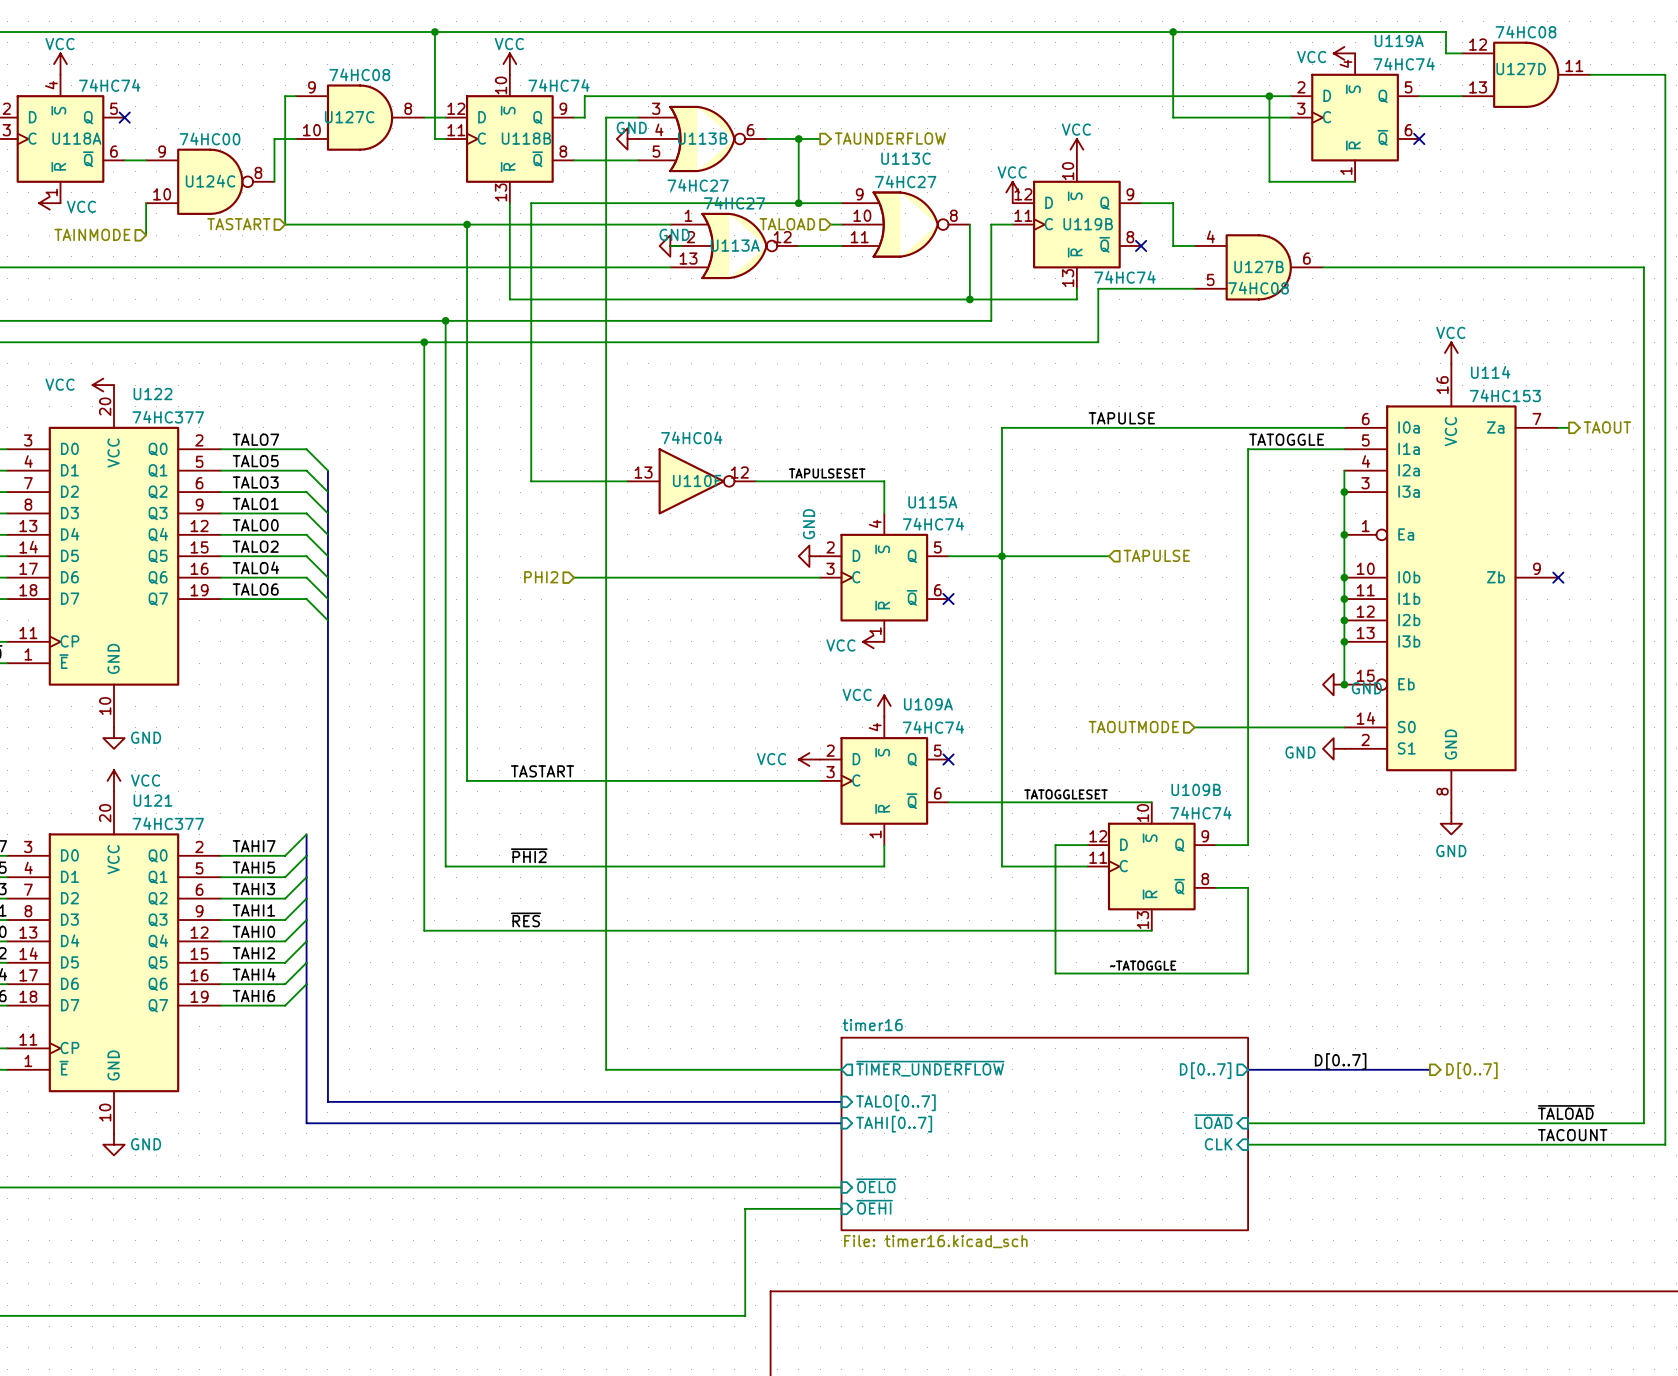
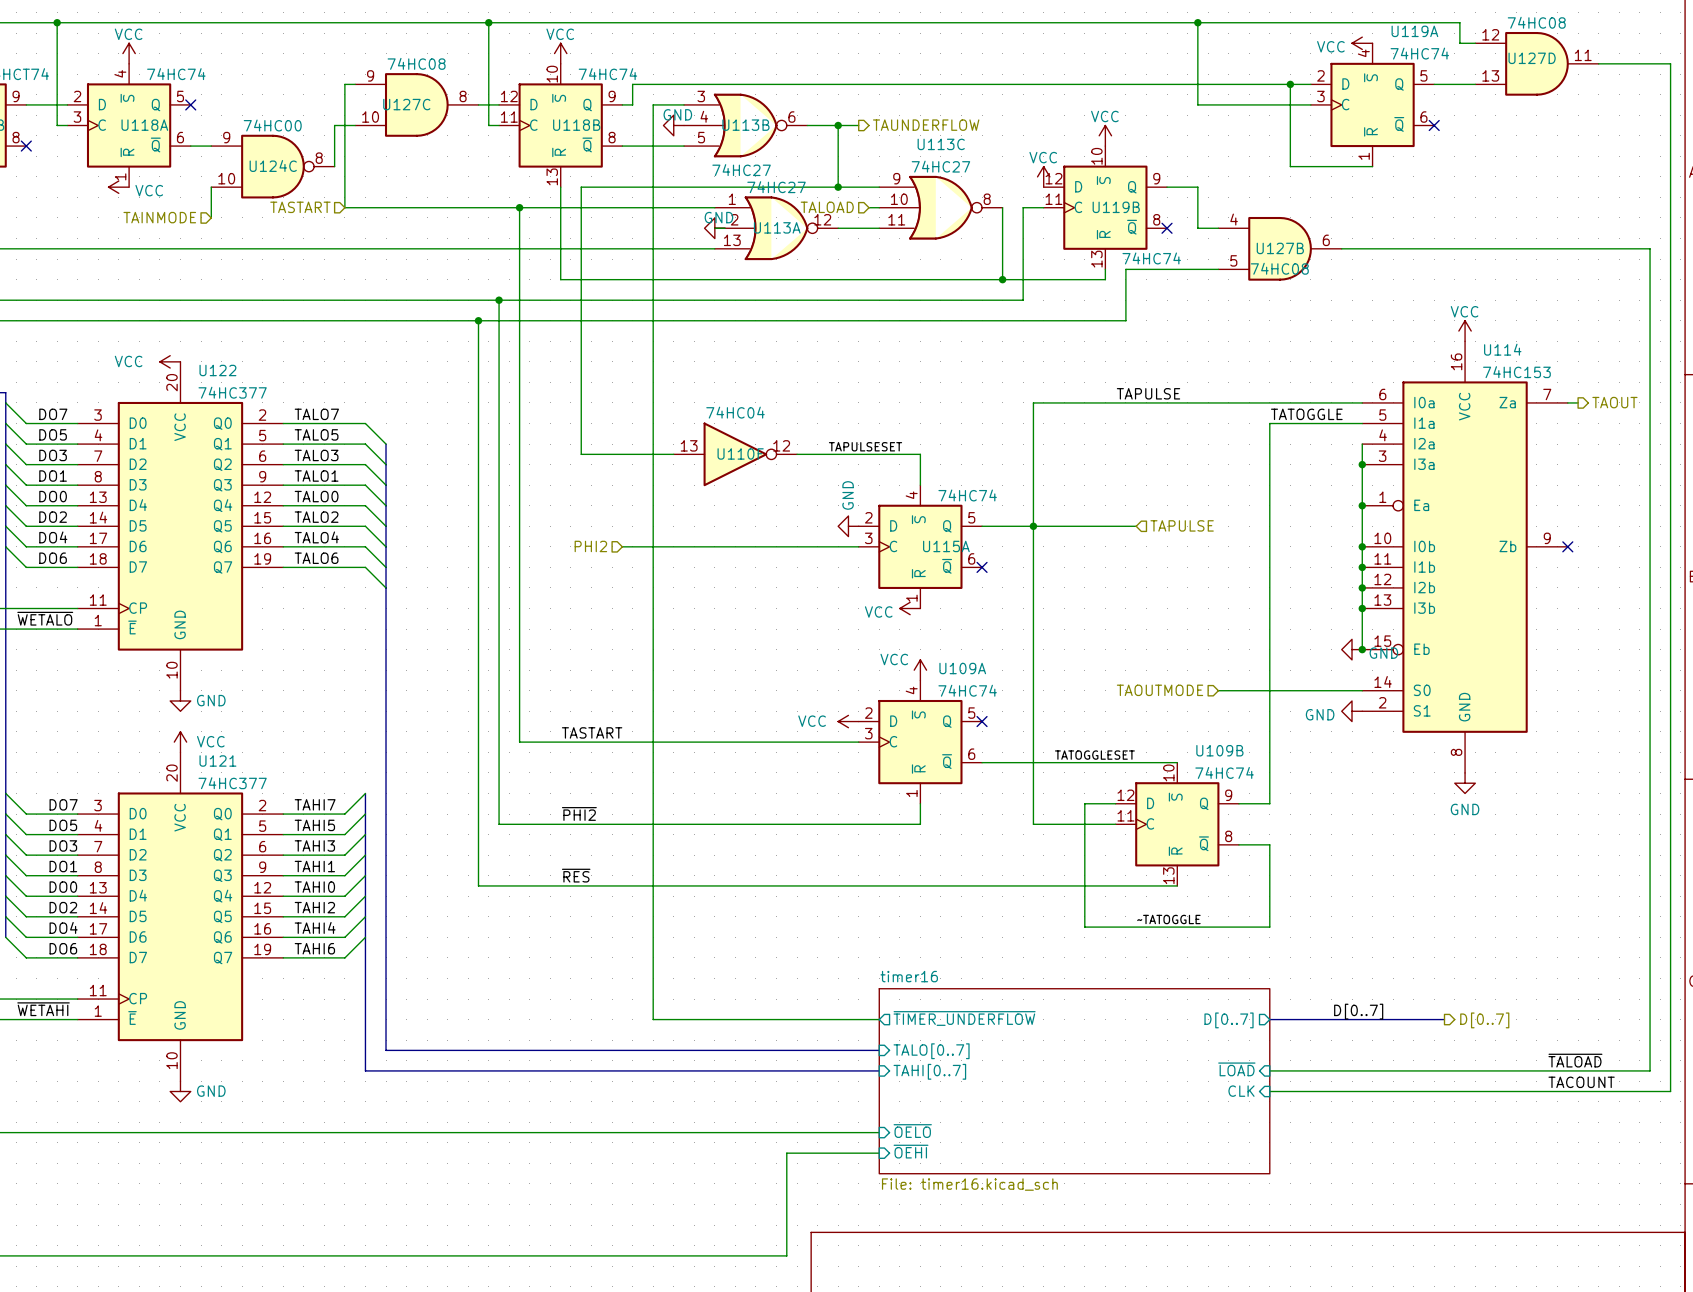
U115A name position: U115A (932, 502) -> U115A (946, 546)

